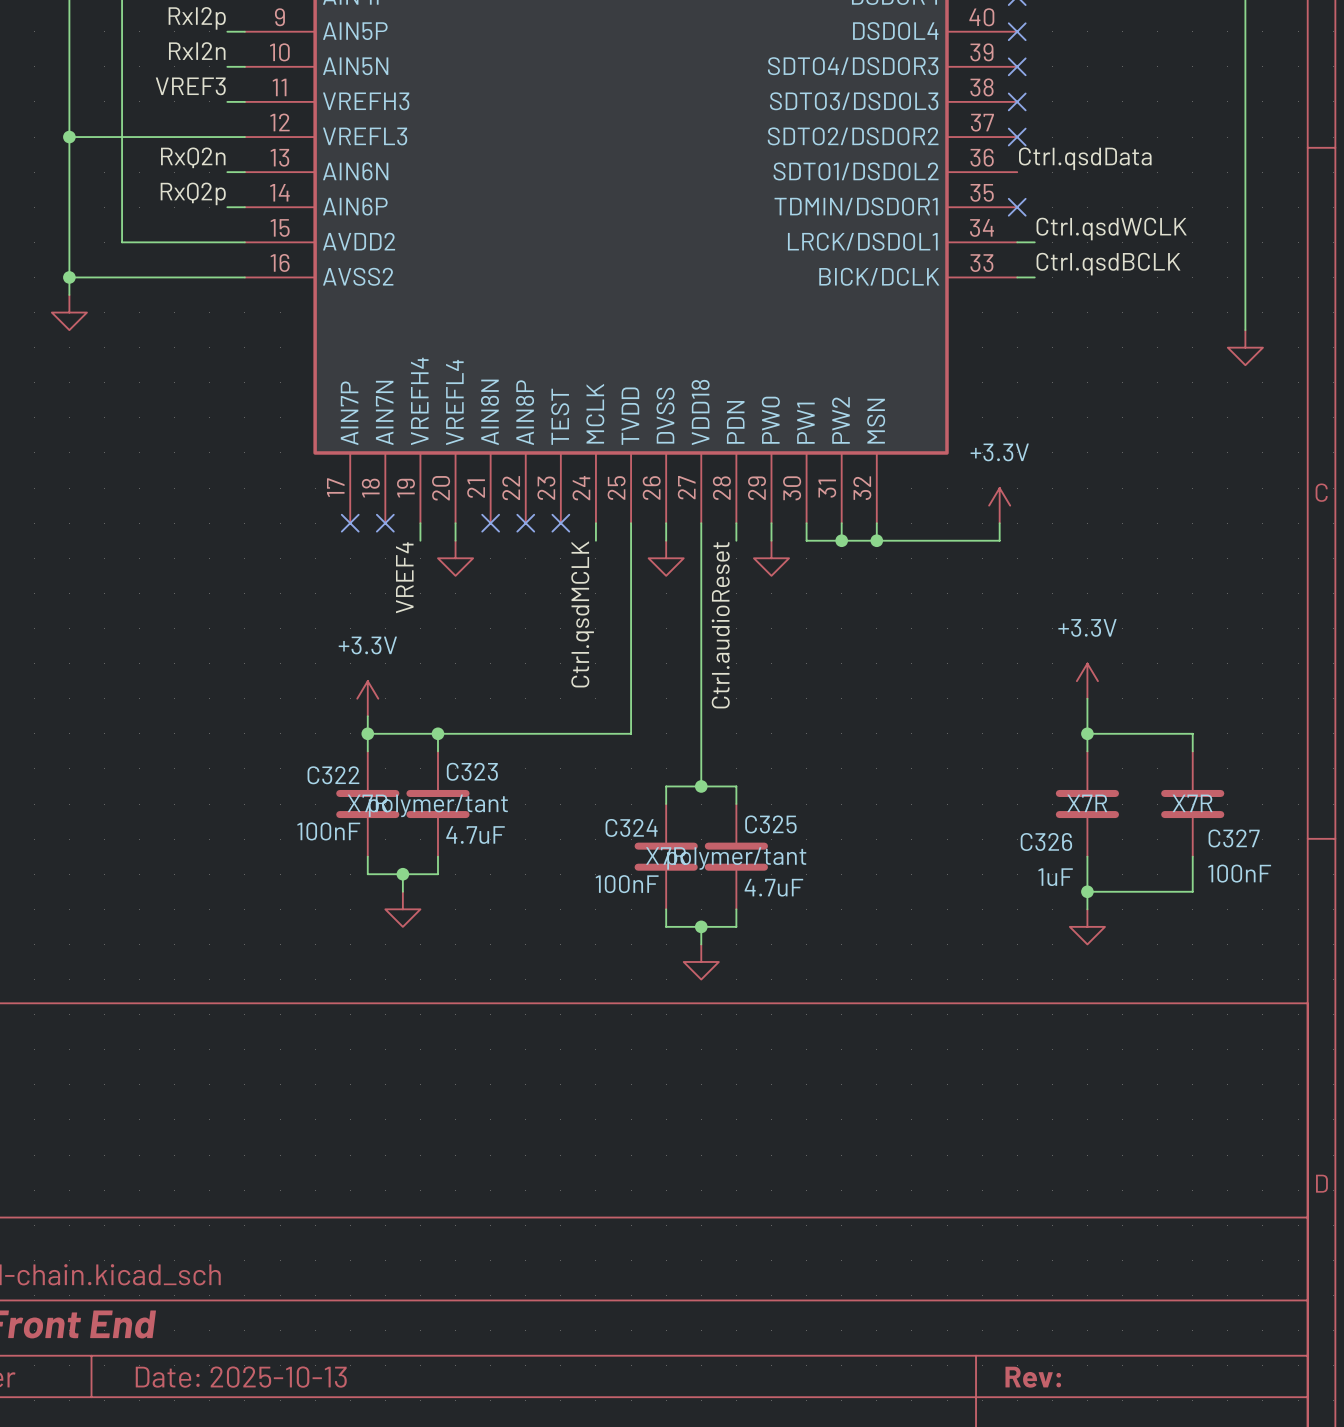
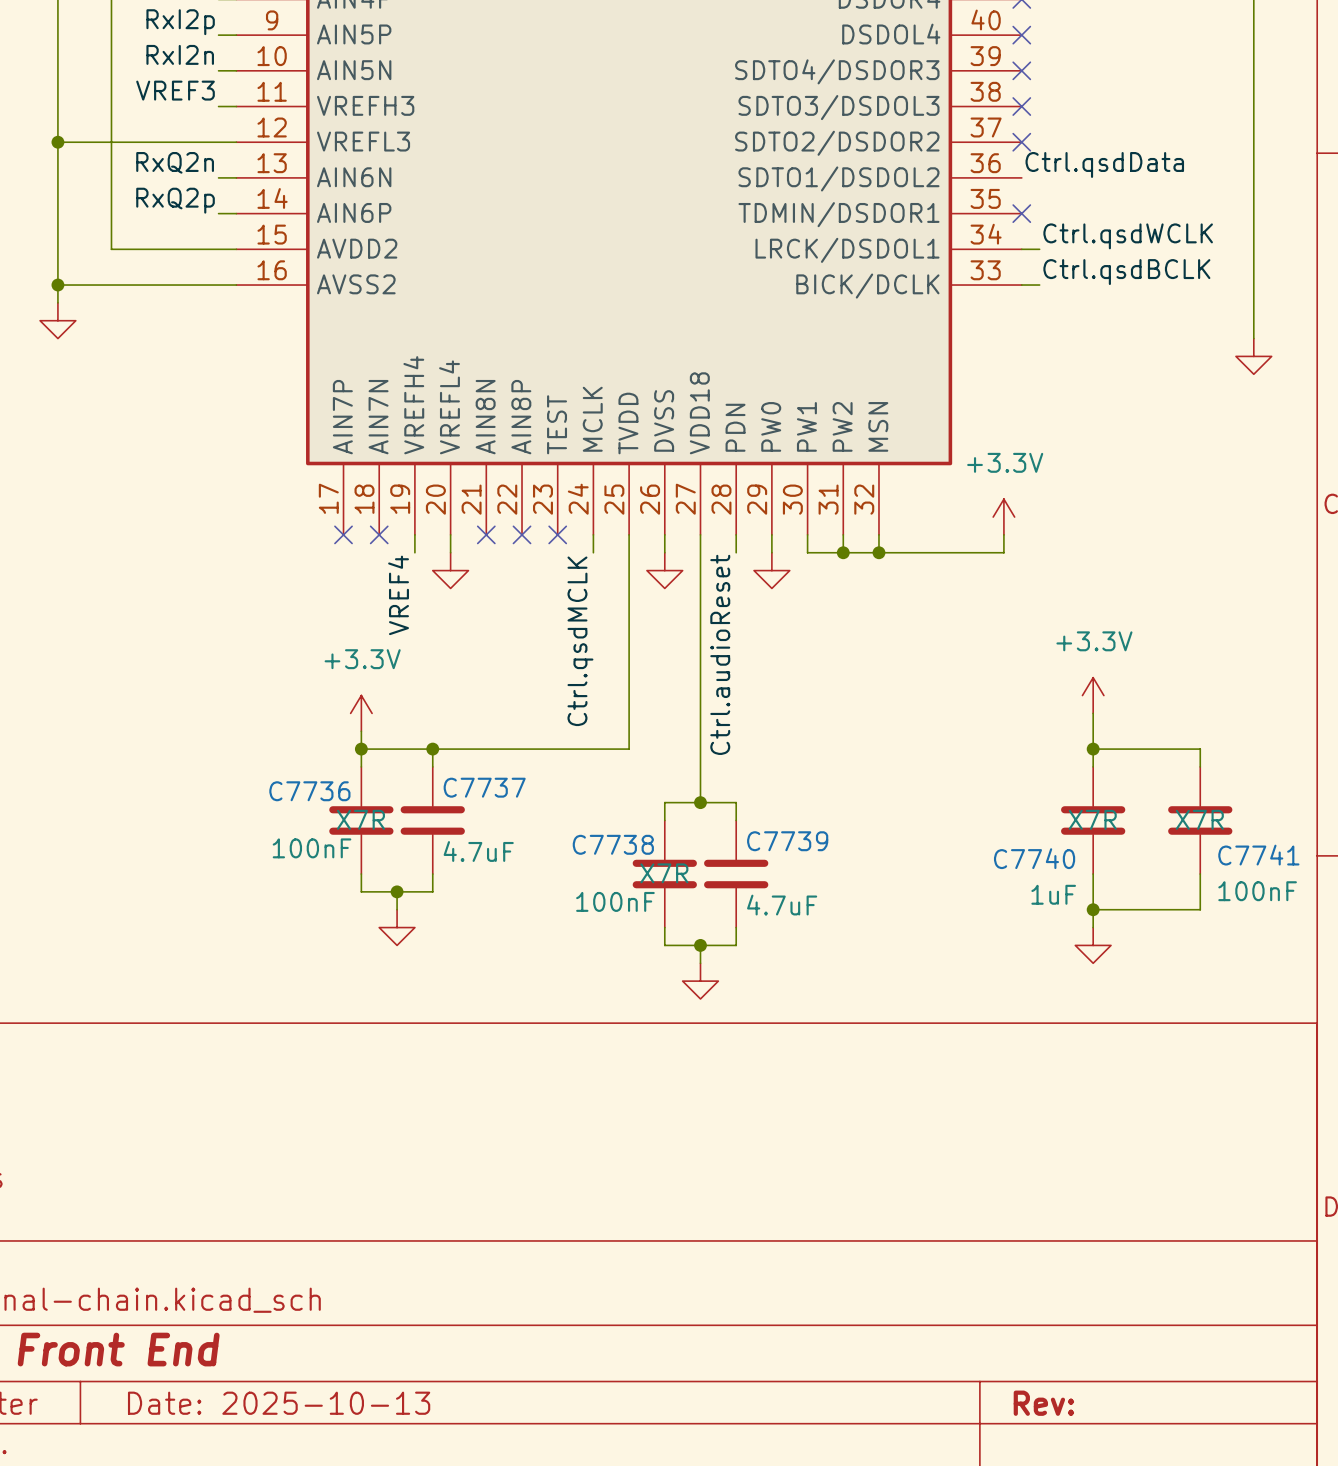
C323 name: C323 (472, 771) -> C7737 (484, 787)
C322 name: C322 (333, 775) -> C7736 (309, 791)
C323 text: polymer/tant (438, 805) -> none
C325 name: C325 (770, 824) -> C7739 (787, 841)
C324 name: C324 (631, 827) -> C7738 (613, 844)
C327 name: C327 (1234, 838) -> C7741 (1258, 855)
C326 name: C326 (1046, 841) -> C7740 (1034, 858)
C325 text: polymer/tant (736, 858) -> none

